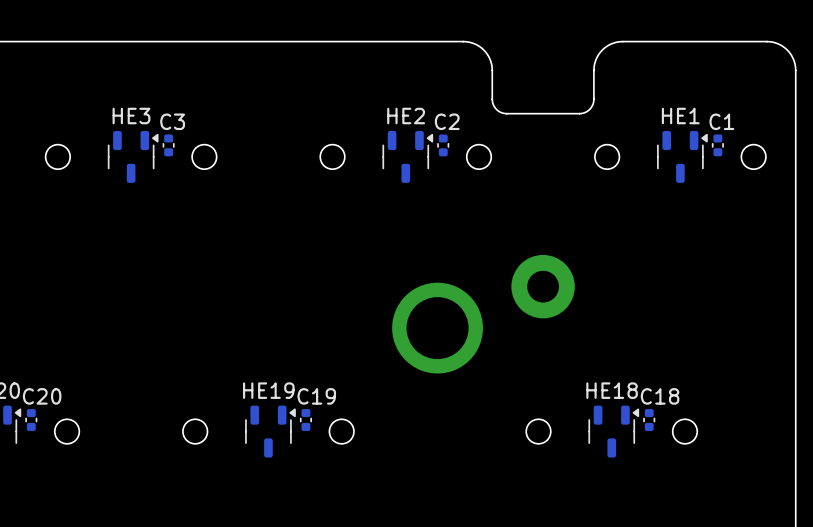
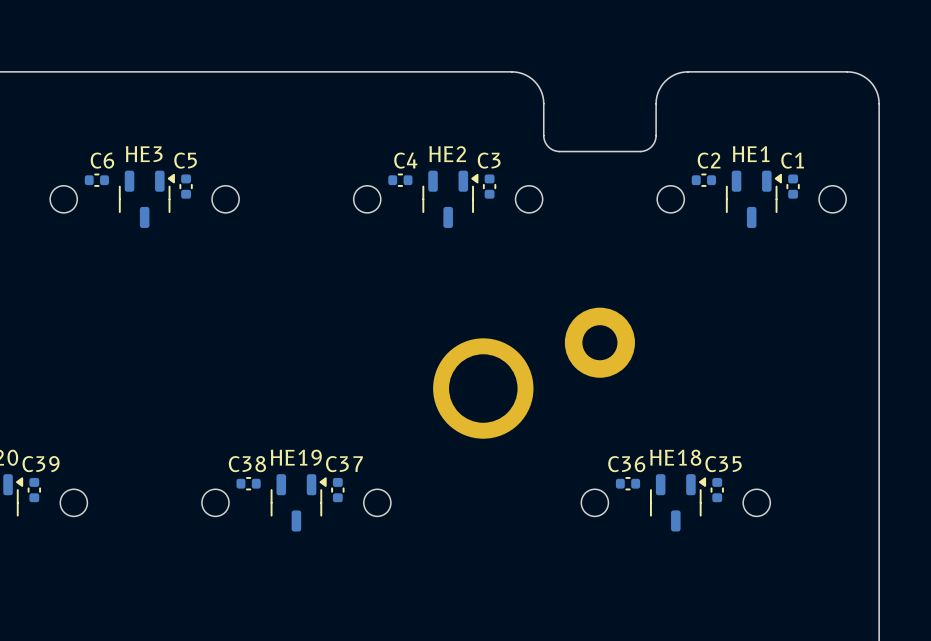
C3 name: C3 (172, 121) -> C5 (185, 160)
C2 name: C2 (447, 121) -> C3 (489, 160)
C6: none -> (96, 180)
C4: none -> (400, 180)
C2: none -> (703, 180)
C20 name: C20 (42, 396) -> C39 (41, 464)
C19 name: C19 (316, 396) -> C37 (344, 464)
C18 name: C18 (660, 396) -> C35 (723, 464)
C38: none -> (248, 483)
C36: none -> (628, 483)

